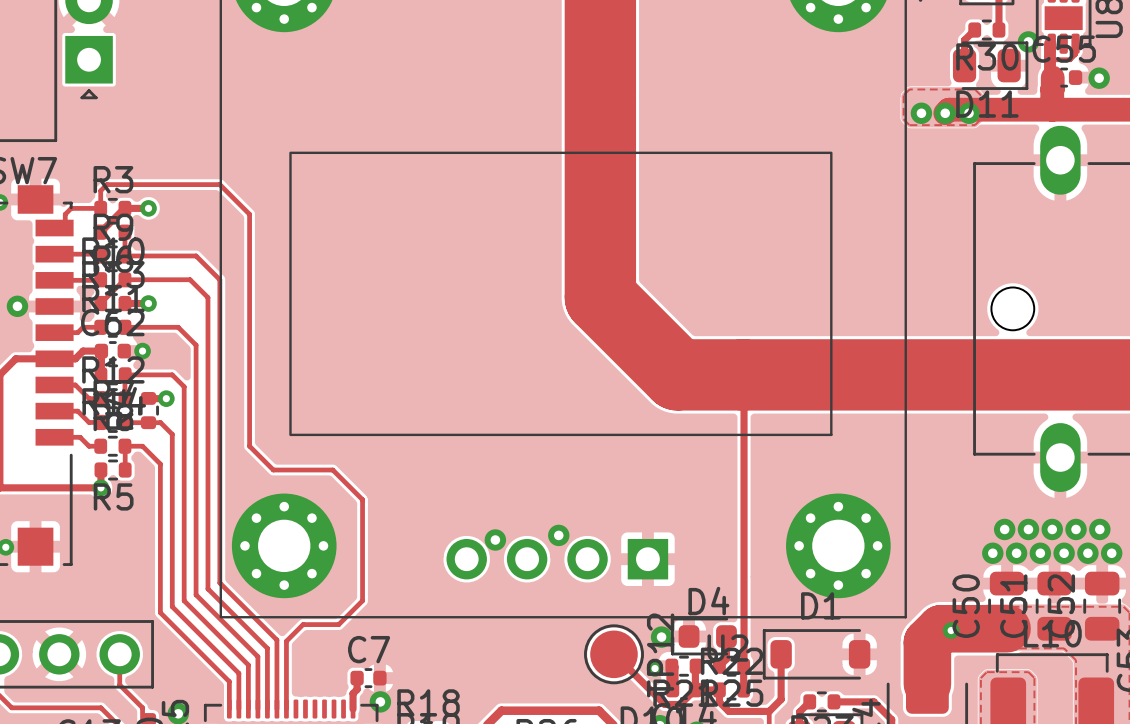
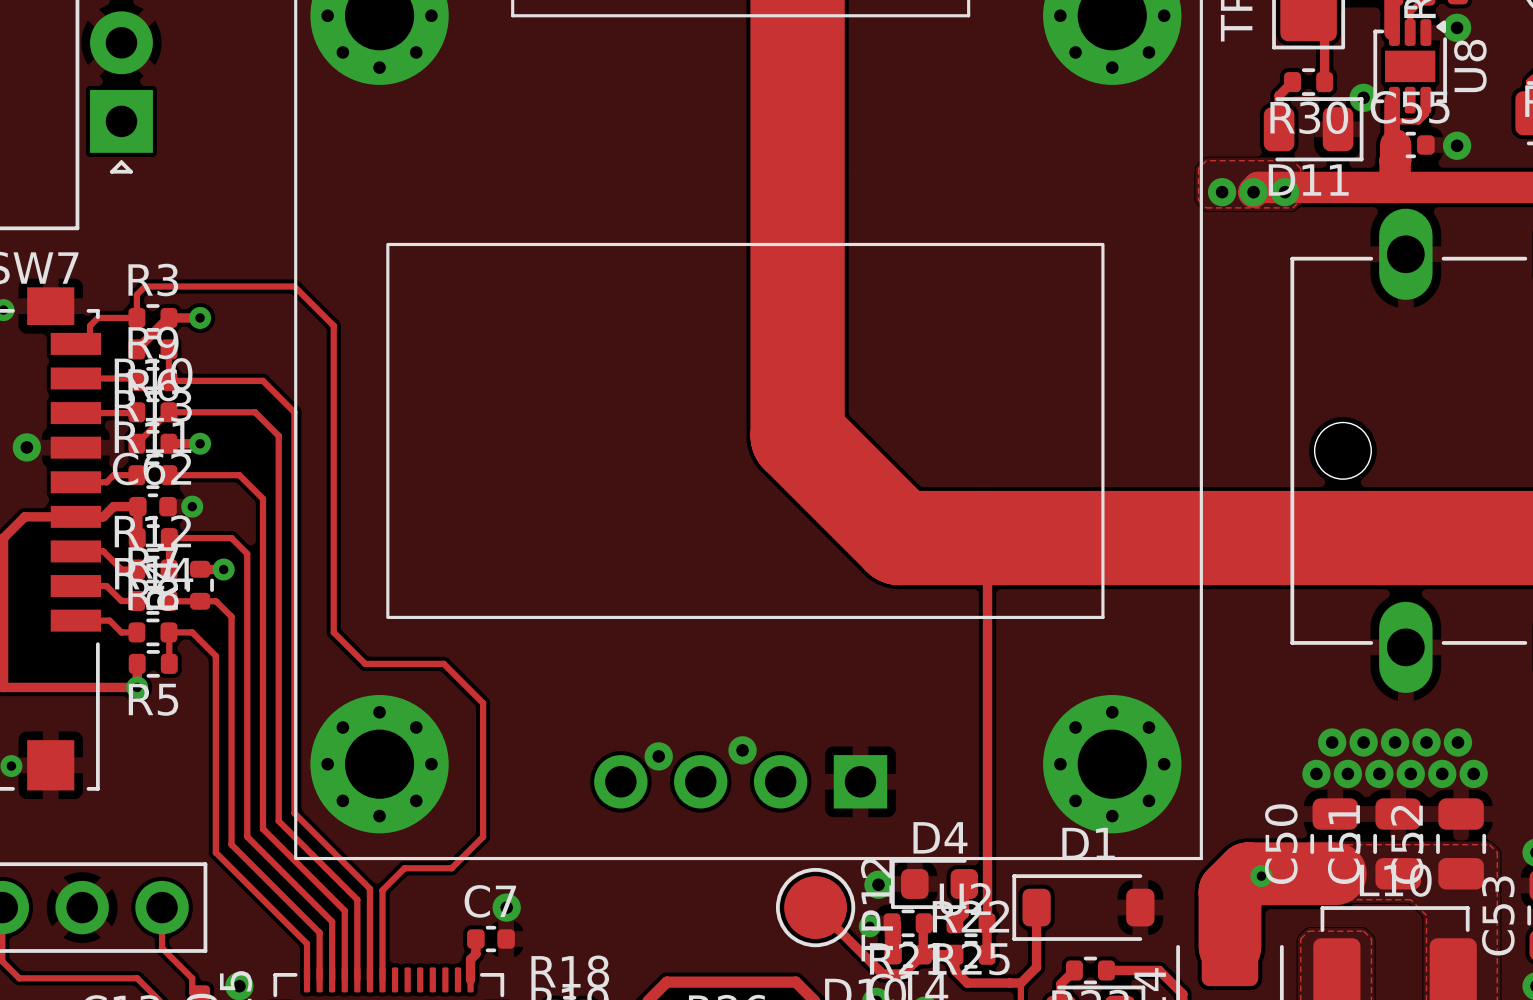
via position: (380, 701) -> (506, 907)

